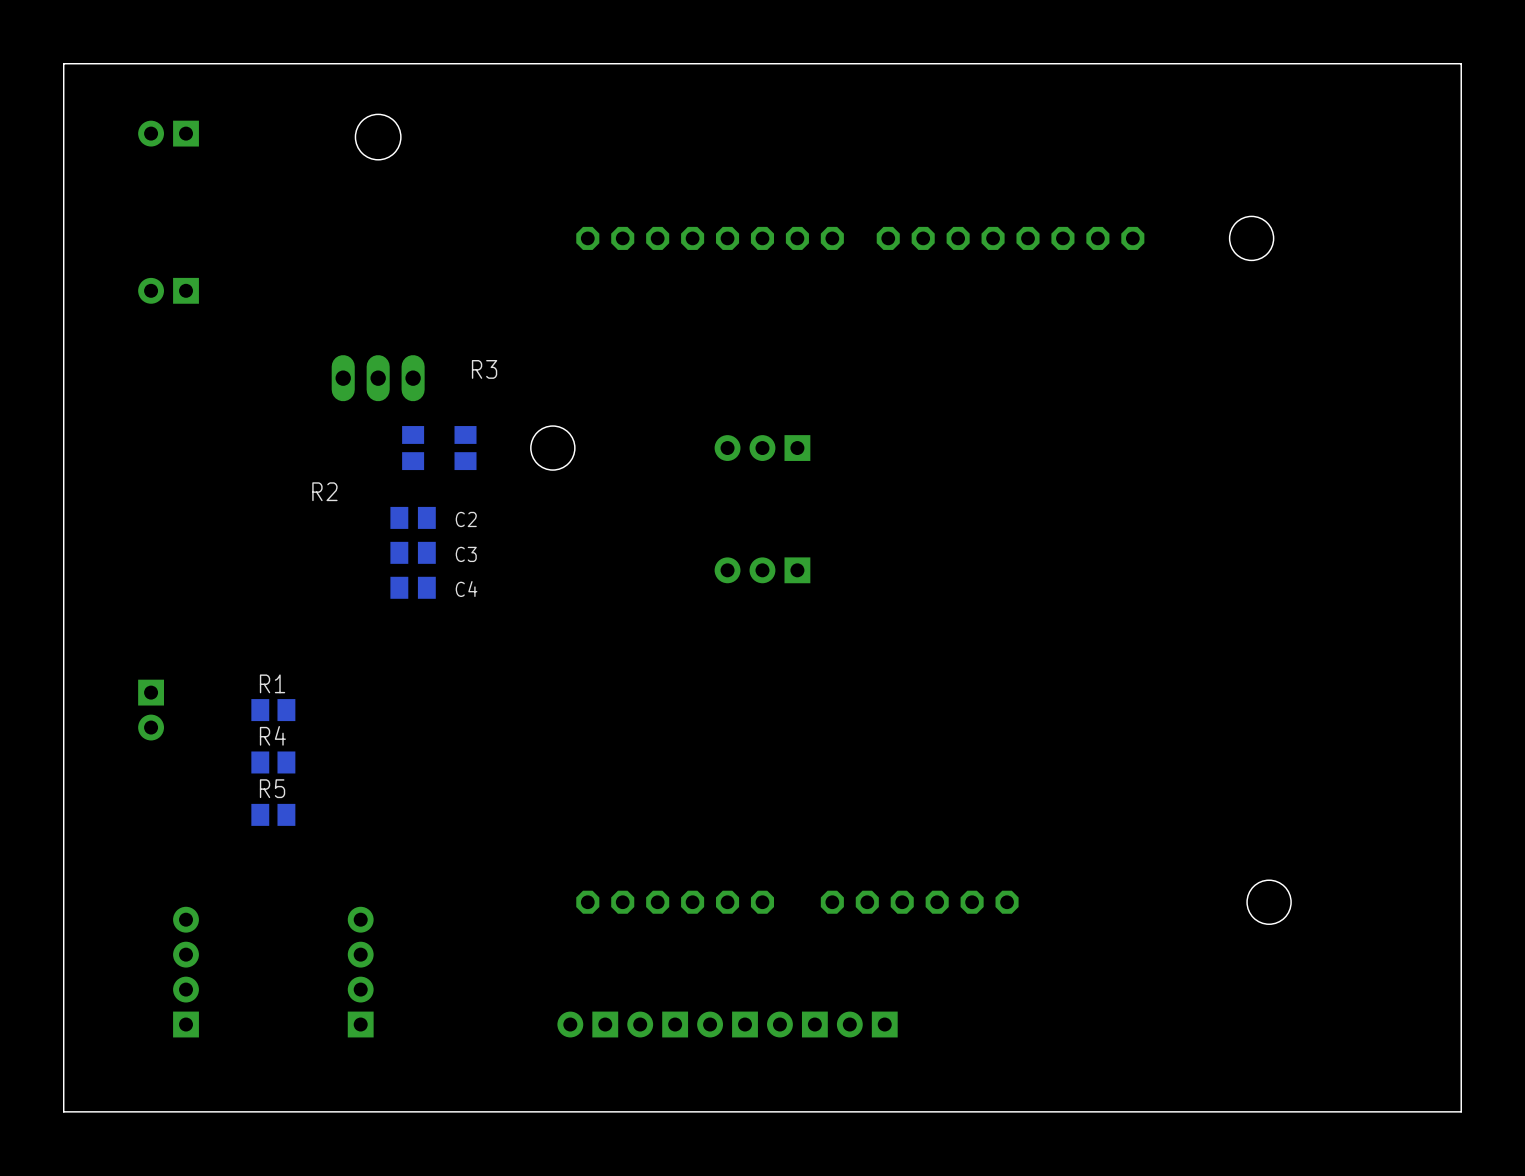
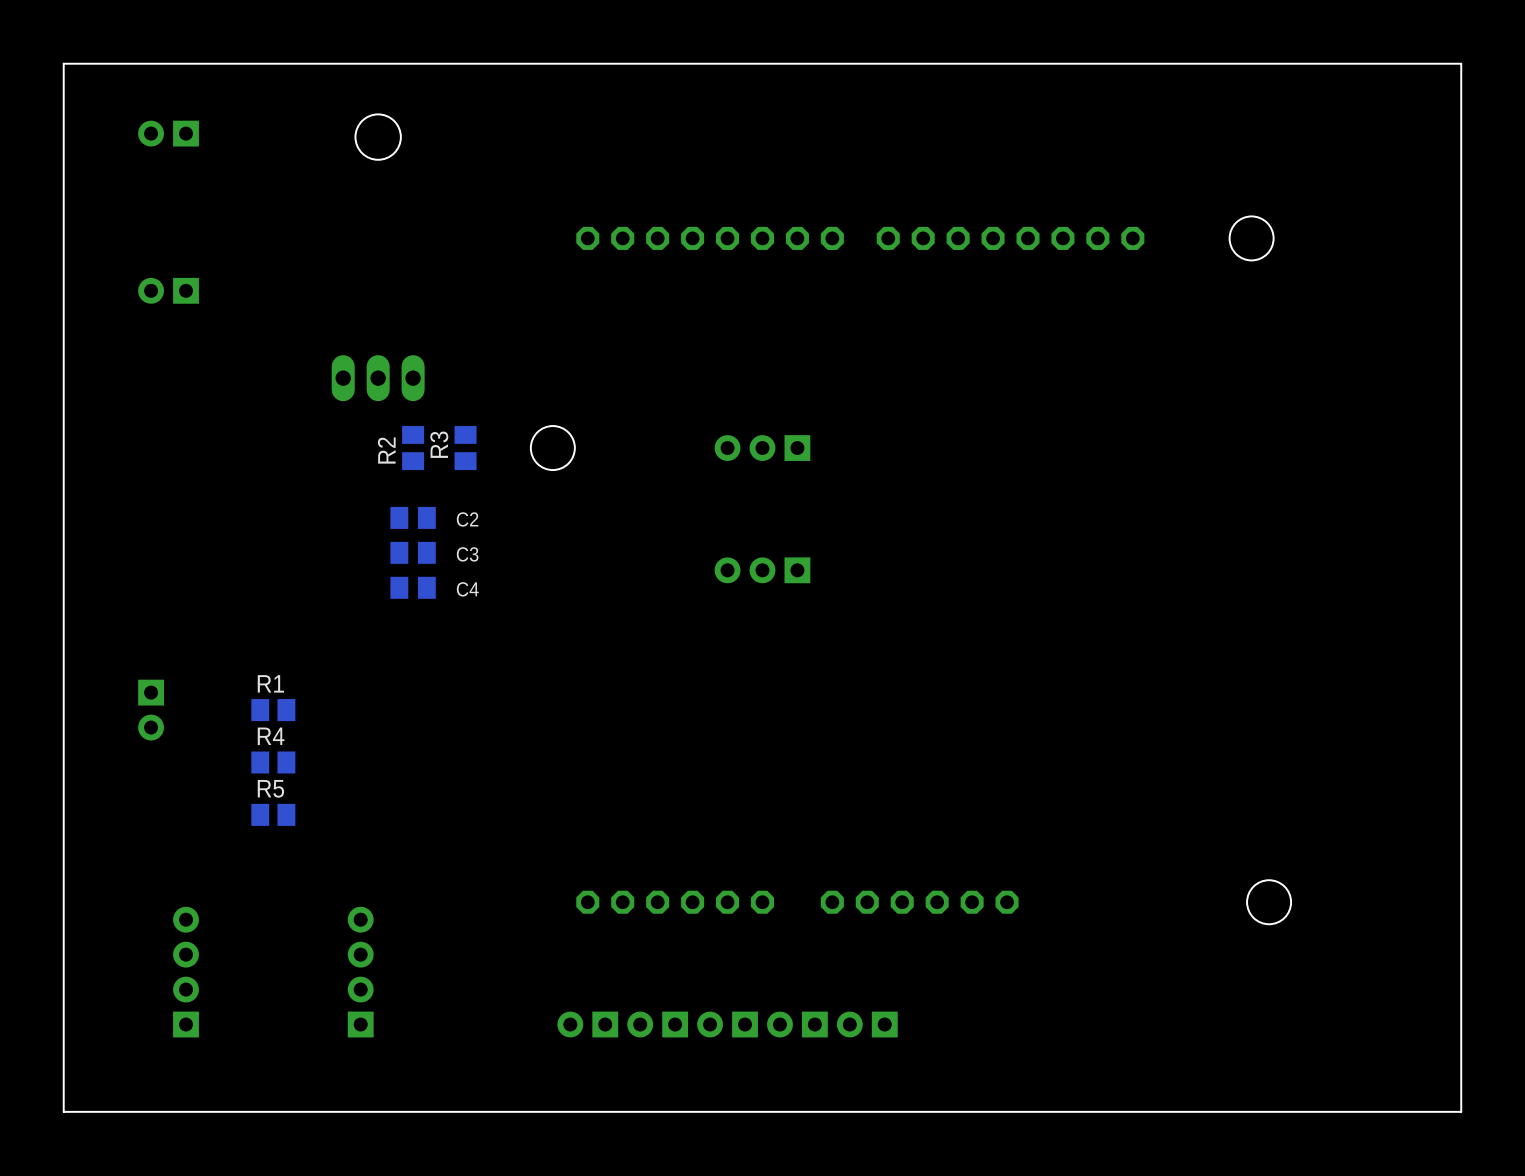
R3 name rotation: 0° (484, 369) -> 90° counterclockwise (439, 444)
R3 name position: R3 (484, 369) -> R3 (439, 444)
R2 name rotation: 0° (324, 491) -> 90° counterclockwise (386, 450)
R2 name position: R2 (324, 491) -> R2 (386, 450)

